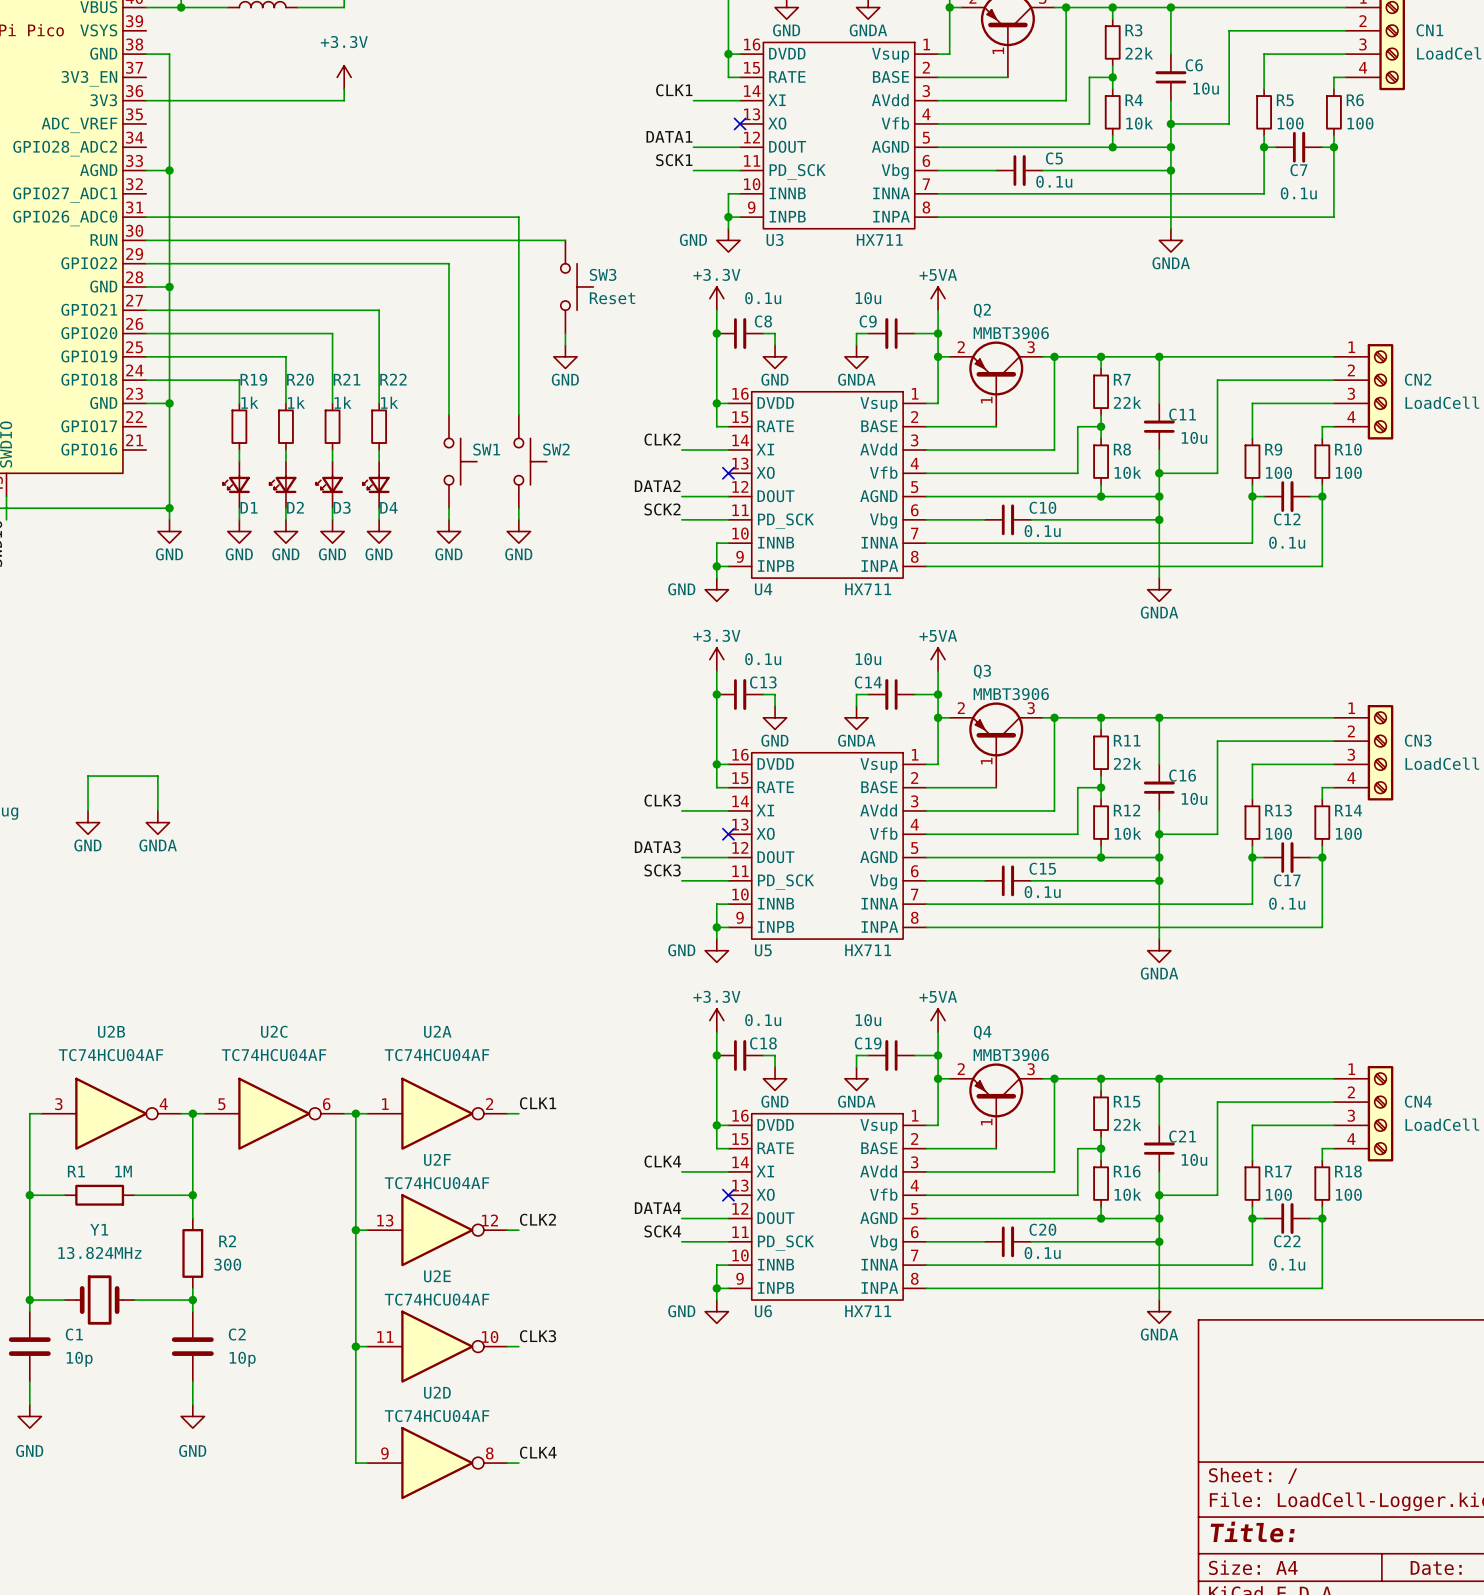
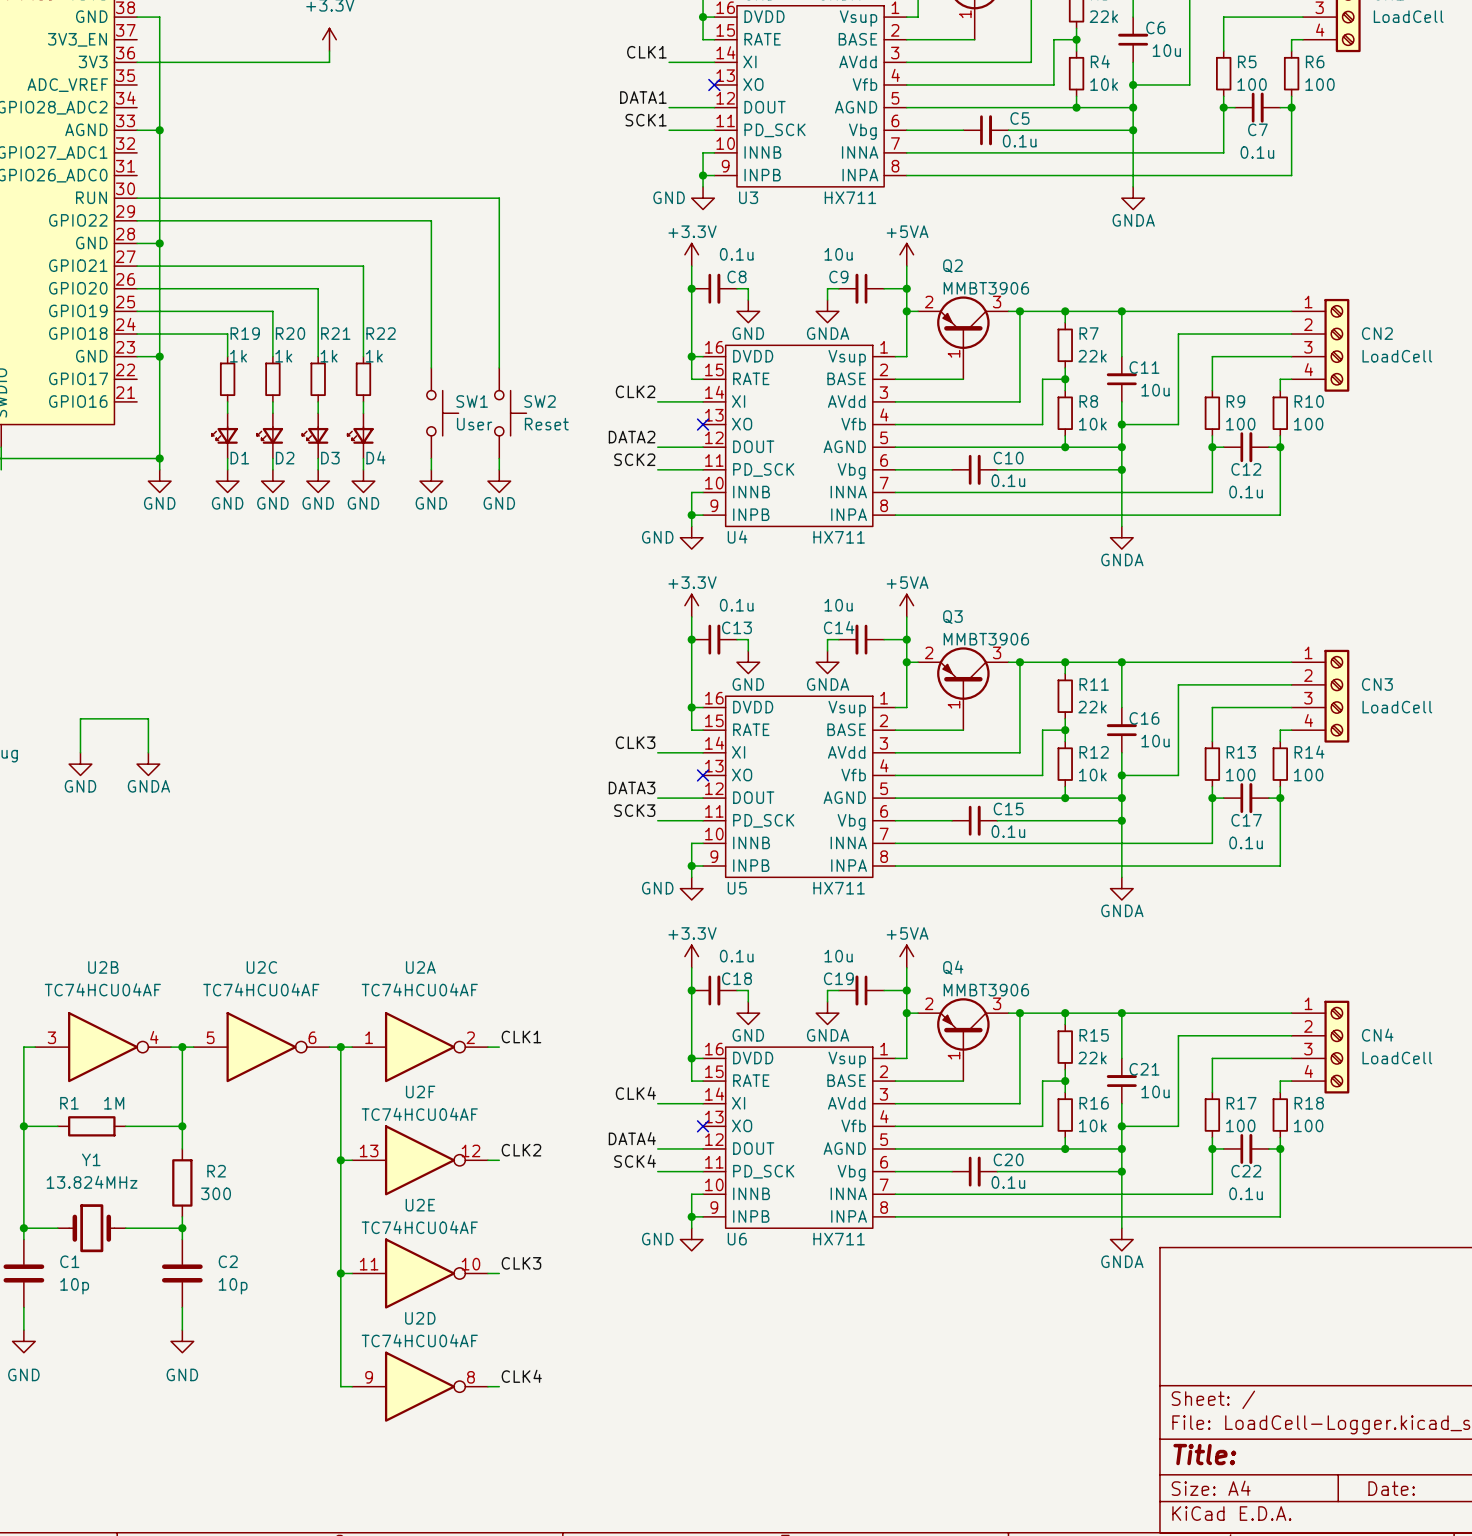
wire: (146, 217) (518, 217) (518, 240) (565, 240) -> none
SW3: Reset (577, 286) -> none
wire: (565, 333) (565, 345) -> none
power symbol: GND (565, 356) -> none
SW1 value: none -> User (474, 424)
SW2 value: none -> Reset (546, 424)

